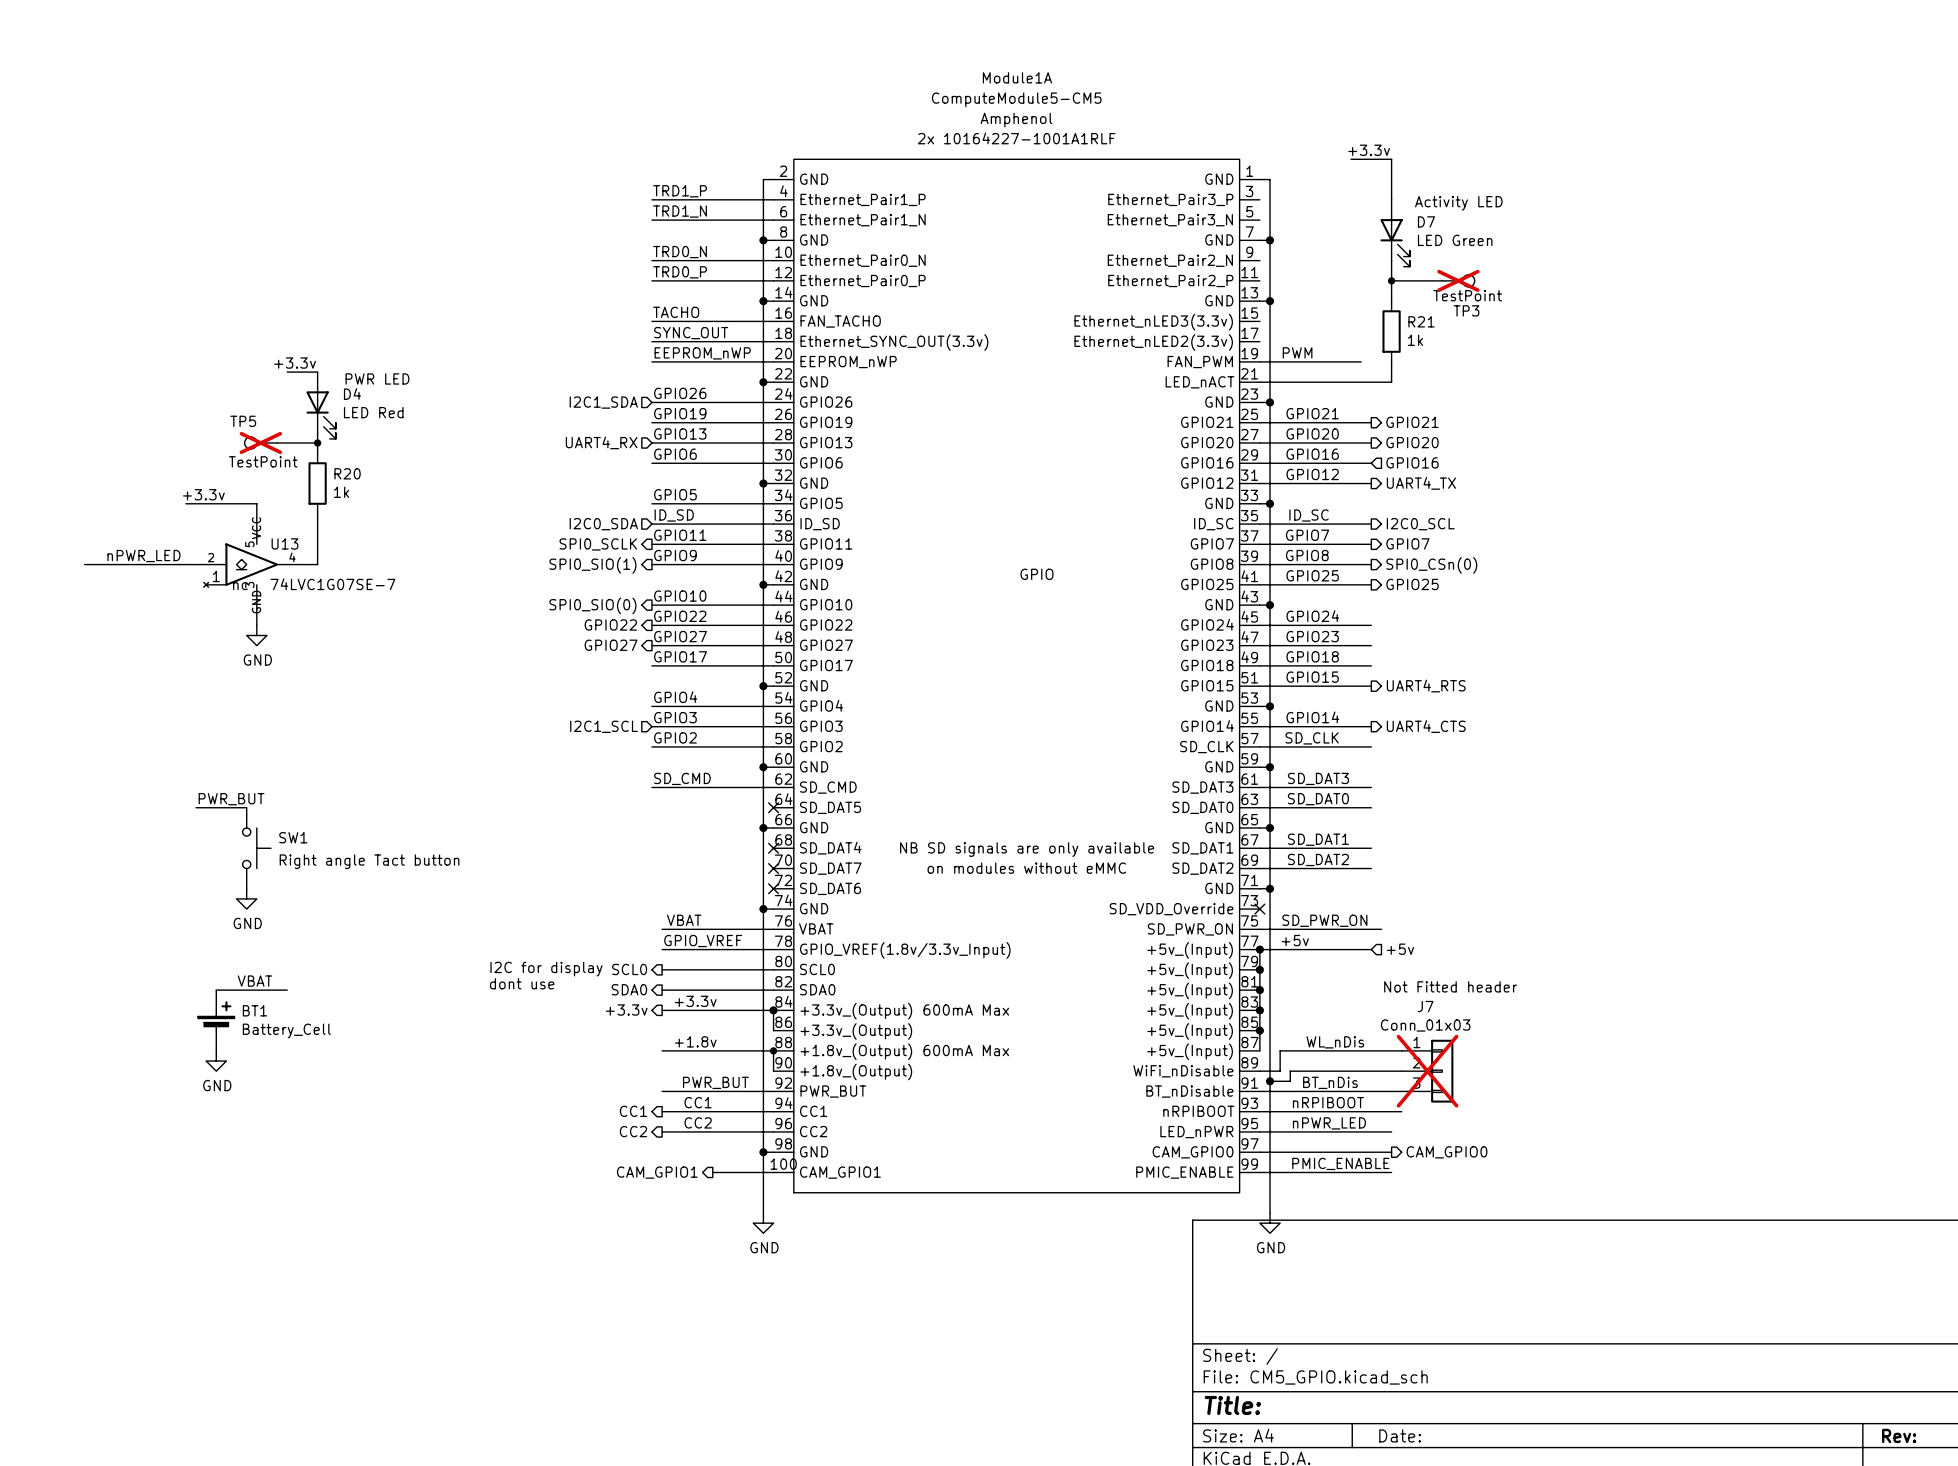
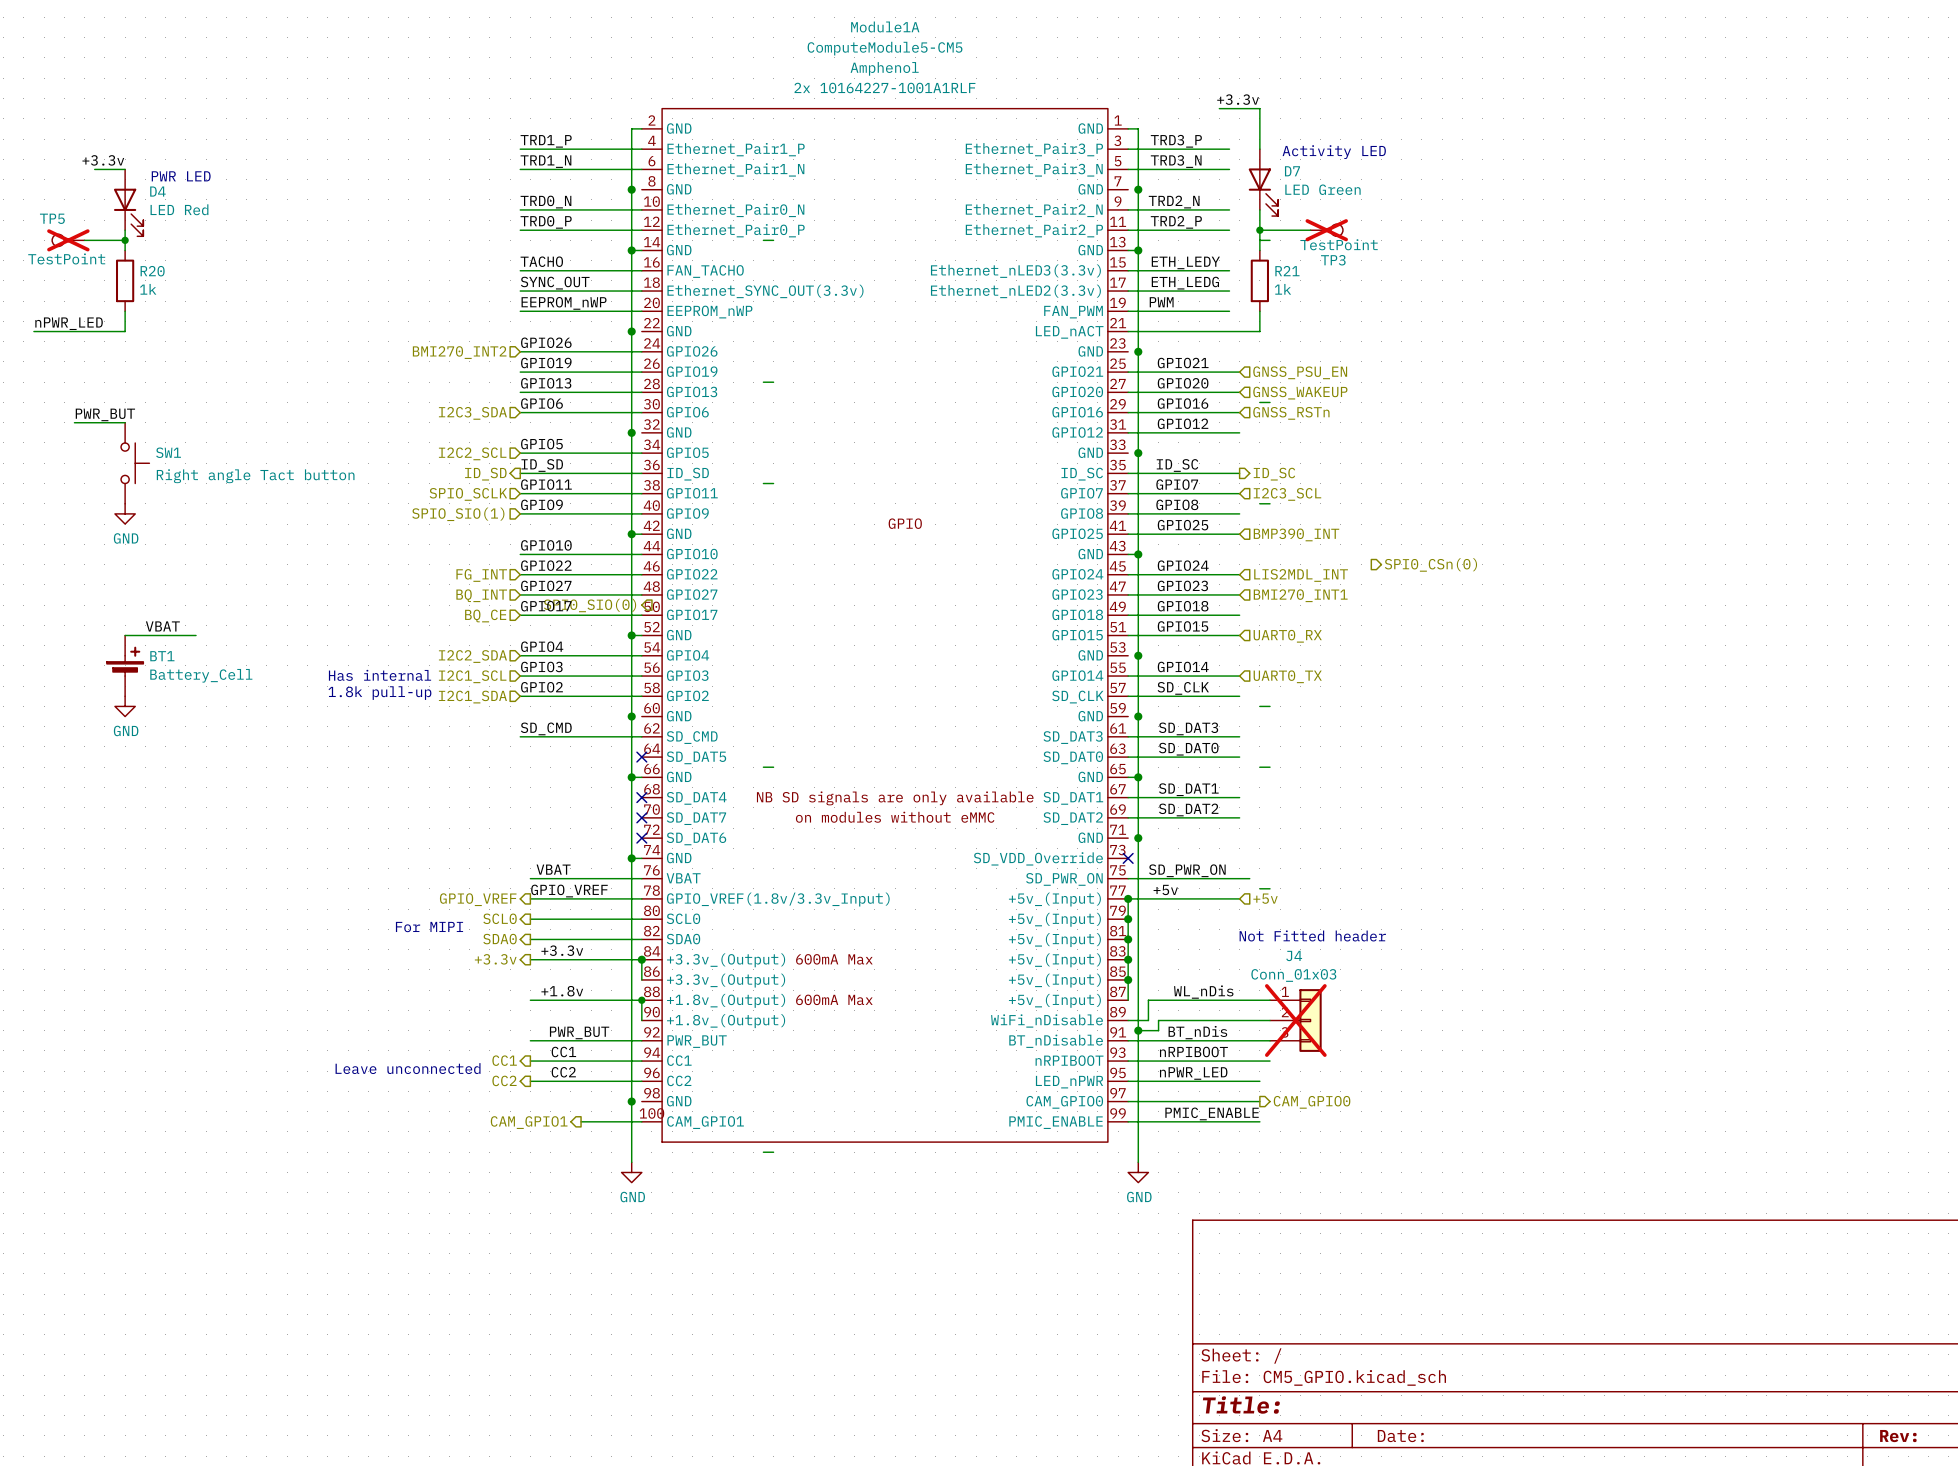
label: none -> TRD3_P (1176, 141)
wire: none -> (1128, 149) (1229, 149)
label position: +3.3v (1369, 150) -> +3.3v (1238, 99)
wire: (1351, 159) (1391, 159) (1391, 199) -> (1219, 108) (1259, 108) (1259, 149)
label: none -> +3.3v (103, 160)
label: none -> TRD3_N (1176, 161)
wire: none -> (94, 169) (125, 169)
wire: none -> (1128, 169) (1229, 169)
text: none -> PWR LED (181, 176)
wire: (773, 179) (763, 179) (763, 1213) -> (641, 128) (631, 128) (631, 1162)
wire: (1259, 179) (1270, 179) (1270, 1213) -> (1128, 128) (1138, 128) (1138, 1162)
junction: none -> (631, 189)
junction: none -> (1138, 189)
label position: TRD1_P (680, 191) -> TRD1_P (546, 141)
wire: (651, 199) (773, 199) -> (520, 149) (641, 149)
label: none -> TRD2_N (1174, 202)
text position: Activity LED (1458, 203) -> Activity LED (1334, 152)
wire: none -> (1128, 209) (1229, 209)
label position: TRD1_N (680, 211) -> TRD1_N (545, 161)
wire: (651, 220) (773, 220) -> (520, 169) (641, 169)
label: none -> TRD2_P (1176, 222)
wire: none -> (125, 230) (125, 250)
wire: none -> (1128, 230) (1229, 230)
junction: none -> (1259, 230)
D7 position: (1395, 233) -> (1263, 182)
wire: none -> (84, 240) (125, 240)
junction: none -> (125, 240)
junction: (763, 240) -> none
junction: (1270, 240) -> none
junction: none -> (631, 250)
junction: none -> (1138, 250)
label position: TRD0_N (680, 252) -> TRD0_N (545, 202)
wire: (651, 260) (773, 260) -> (520, 209) (641, 209)
wire: (1391, 260) (1391, 301) -> (1259, 209) (1259, 250)
label: none -> ETH_LEDY (1185, 262)
wire: none -> (1128, 270) (1229, 270)
label position: TRD0_P (680, 272) -> TRD0_P (546, 222)
wire: (651, 280) (773, 280) -> (520, 230) (641, 230)
wire: (1391, 280) (1442, 280) -> (1259, 230) (1310, 230)
junction: (1391, 280) -> none
TP3 position: (1458, 280) -> (1326, 230)
label: none -> ETH_LEDG (1185, 283)
wire: none -> (1128, 291) (1229, 291)
wire: (763, 301) (773, 301) -> (631, 250) (641, 250)
junction: (763, 301) -> none
junction: (1270, 301) -> none
wire: none -> (125, 311) (125, 331) (33, 331)
label position: TACHO (676, 312) -> TACHO (541, 261)
wire: (651, 321) (773, 321) -> (520, 270) (641, 270)
label: none -> nPWR_LED (69, 323)
junction: none -> (631, 331)
R21 position: (1391, 331) -> (1259, 280)
label position: SYNC_OUT (691, 333) -> SYNC_OUT (555, 283)
wire: (651, 341) (773, 341) -> (520, 291) (641, 291)
hierarchical label: none -> BMI270_INT2 (459, 352)
junction: none -> (1138, 351)
label position: PWM (1297, 352) -> PWM (1161, 302)
label position: EEPROM_nWP (702, 353) -> EEPROM_nWP (564, 303)
wire: (651, 361) (773, 361) -> (520, 311) (641, 311)
wire: (1259, 361) (1361, 361) -> (1128, 311) (1229, 311)
wire: (1391, 361) (1391, 382) (1259, 382) -> (1259, 311) (1259, 331) (1128, 331)
label: +3.3v (295, 363) -> none
wire: (287, 372) (317, 372) -> none
hierarchical label: none -> GNSS_PSU_EN (1300, 372)
text: PWR LED (377, 378) -> none
junction: (763, 382) -> none
hierarchical label: none -> GNSS_WAKEUP (1300, 393)
label position: GPIO26 (680, 393) -> GPIO26 (546, 342)
hierarchical label: I2C1_SDA (603, 402) -> none
wire: (651, 402) (773, 402) -> (520, 351) (641, 351)
junction: (1270, 402) -> none
D4 position: (321, 405) -> (128, 202)
hierarchical label: none -> I2C3_SDA (472, 413)
hierarchical label: none -> GNSS_RSTn (1291, 413)
label position: GPIO19 (680, 413) -> GPIO19 (546, 363)
label position: GPIO21 (1312, 413) -> GPIO21 (1183, 363)
label: none -> PWR_BUT (105, 414)
wire: none -> (74, 422) (125, 422)
wire: (651, 422) (773, 422) -> (520, 372) (641, 372)
wire: (1259, 422) (1371, 422) -> (1128, 372) (1239, 372)
hierarchical label: GPIO21 (1412, 422) -> none
wire: (317, 432) (317, 453) -> none
junction: none -> (631, 432)
label position: GPIO13 (680, 433) -> GPIO13 (546, 383)
label position: GPIO20 (1312, 433) -> GPIO20 (1183, 383)
TP5 position: (260, 442) -> (68, 240)
wire: (277, 442) (317, 442) -> none
junction: (317, 442) -> none
hierarchical label: UART4_RX (601, 442) -> none
wire: (651, 442) (773, 442) -> (520, 392) (641, 392)
wire: (1259, 442) (1371, 442) -> (1128, 392) (1239, 392)
hierarchical label: GPIO20 (1412, 442) -> none
hierarchical label: none -> I2C2_SCL (472, 453)
junction: none -> (1138, 453)
label position: GPIO6 (675, 454) -> GPIO6 (541, 403)
label position: GPIO16 (1312, 454) -> GPIO16 (1183, 403)
hierarchical label: GPIO16 (1412, 462) -> none
wire: (651, 463) (773, 463) -> (520, 412) (641, 412)
wire: (1259, 463) (1371, 463) -> (1128, 412) (1239, 412)
hierarchical label: none -> ID_SD (485, 474)
hierarchical label: none -> ID_SC (1274, 474)
label position: GPIO12 (1312, 474) -> GPIO12 (1183, 423)
R20 position: (317, 483) -> (125, 280)
junction: (763, 483) -> none
wire: (1259, 483) (1371, 483) -> (1128, 432) (1239, 432)
hierarchical label: UART4_TX (1421, 483) -> none
hierarchical label: none -> SPIO_SCLK (468, 494)
hierarchical label: none -> I2C3_SCL (1287, 494)
label: +3.3v (203, 494) -> none
label position: GPIO5 (675, 494) -> GPIO5 (541, 444)
wire: (185, 503) (256, 503) (256, 544) -> none
wire: (651, 503) (773, 503) -> (520, 453) (641, 453)
junction: (1270, 503) -> none
power symbol: none -> GND (125, 513)
wire: (317, 513) (317, 564) (307, 564) -> none
hierarchical label: none -> SPIO_SIO(1) (458, 514)
label position: ID_SD (674, 515) -> ID_SD (542, 465)
label position: ID_SC (1309, 515) -> ID_SC (1177, 465)
hierarchical label: I2C0_SDA (603, 524) -> none
wire: (651, 524) (773, 524) -> (520, 473) (641, 473)
wire: (1259, 524) (1371, 524) -> (1128, 473) (1239, 473)
hierarchical label: I2C0_SCL (1420, 524) -> none
junction: none -> (631, 534)
hierarchical label: none -> BMP390_INT (1296, 534)
label position: GPIO11 (680, 535) -> GPIO11 (546, 484)
label position: GPIO7 (1307, 535) -> GPIO7 (1177, 484)
hierarchical label: GPIO7 (1407, 543) -> none
hierarchical label: SPI0_SCLK (598, 544) -> none
wire: (651, 544) (773, 544) -> (520, 493) (641, 493)
wire: (1259, 544) (1371, 544) -> (1128, 493) (1239, 493)
junction: none -> (1138, 554)
label position: GPIO9 (675, 555) -> GPIO9 (541, 504)
label position: GPIO8 (1307, 555) -> GPIO8 (1177, 504)
label: nPWR_LED (144, 556) -> none
wire: (84, 564) (196, 564) -> none
wire: (651, 564) (773, 564) -> (520, 513) (641, 513)
wire: (1259, 564) (1371, 564) -> (1128, 513) (1239, 513)
U13: 74LVC1G07SE-7 (251, 565) -> none
hierarchical label: SPI0_SIO(1) (592, 565) -> none
hierarchical label: none -> FG_INT (481, 575)
hierarchical label: none -> LIS2MDL_INT (1301, 575)
label position: GPIO25 (1312, 575) -> GPIO25 (1183, 525)
wire: (256, 584) (256, 625) -> none
wire: (763, 584) (773, 584) -> (631, 534) (641, 534)
junction: (763, 584) -> none
wire: (1259, 584) (1371, 584) -> (1128, 534) (1239, 534)
hierarchical label: GPIO25 (1412, 584) -> none
hierarchical label: none -> BQ_INT (481, 595)
hierarchical label: none -> BMI270_INT1 (1300, 595)
label position: GPIO10 (680, 596) -> GPIO10 (546, 545)
wire: (651, 605) (773, 605) -> (520, 554) (641, 554)
wire: (1259, 605) (1270, 605) -> (1128, 554) (1138, 554)
junction: (1270, 605) -> none
hierarchical label: none -> BQ_CE (485, 615)
label position: GPIO22 (680, 616) -> GPIO22 (546, 565)
label position: GPIO24 (1312, 616) -> GPIO24 (1183, 565)
hierarchical label: GPIO22 (610, 624) -> none
wire: (651, 625) (773, 625) -> (520, 574) (641, 574)
wire: (1259, 625) (1371, 625) -> (1128, 574) (1239, 574)
label: none -> VBAT (162, 626)
wire: none -> (125, 635) (196, 635)
power symbol: GND (256, 635) -> none
junction: none -> (631, 635)
hierarchical label: none -> UART0_RX (1287, 636)
label position: GPIO27 (680, 636) -> GPIO27 (546, 585)
label position: GPIO23 (1312, 636) -> GPIO23 (1182, 585)
hierarchical label: GPIO27 (611, 645) -> none
wire: (651, 645) (773, 645) -> (520, 594) (641, 594)
wire: (1259, 645) (1371, 645) -> (1128, 594) (1239, 594)
hierarchical label: none -> I2C2_SDA (472, 656)
junction: none -> (1138, 655)
label position: GPIO17 (680, 656) -> GPIO17 (546, 606)
label position: GPIO18 (1312, 656) -> GPIO18 (1183, 606)
wire: (651, 665) (773, 665) -> (520, 615) (641, 615)
wire: (1259, 665) (1371, 665) -> (1128, 615) (1239, 615)
text: none -> Has internal (380, 675)
Module1A position: (1016, 676) -> (884, 625)
hierarchical label: none -> UART0_TX (1287, 676)
label position: GPIO15 (1312, 677) -> GPIO15 (1183, 626)
wire: (763, 686) (773, 686) -> (631, 635) (641, 635)
junction: (763, 686) -> none
wire: (1259, 686) (1371, 686) -> (1128, 635) (1239, 635)
hierarchical label: UART4_RTS (1426, 686) -> none
text: none -> 1.8k pull-up (379, 693)
hierarchical label: none -> I2C1_SDA (472, 697)
label position: GPIO4 (675, 697) -> GPIO4 (542, 646)
power symbol: none -> GND (125, 706)
wire: (651, 706) (773, 706) -> (520, 655) (641, 655)
junction: (1270, 706) -> none
junction: none -> (631, 716)
junction: none -> (1138, 716)
label position: GPIO3 (675, 717) -> GPIO3 (541, 666)
label position: GPIO14 (1312, 717) -> GPIO14 (1183, 666)
hierarchical label position: I2C1_SCL (604, 726) -> I2C1_SCL (472, 676)
wire: (651, 726) (773, 726) -> (520, 676) (641, 676)
wire: (1259, 726) (1371, 726) -> (1128, 676) (1239, 676)
hierarchical label: UART4_CTS (1426, 726) -> none
label position: GPIO2 (675, 737) -> GPIO2 (541, 687)
label position: SD_CLK (1312, 738) -> SD_CLK (1183, 688)
wire: (651, 746) (773, 746) -> (520, 696) (641, 696)
wire: (1259, 746) (1371, 746) -> (1128, 696) (1239, 696)
no-connect mark: none -> (641, 757)
junction: (763, 767) -> none
junction: (1270, 767) -> none
junction: none -> (631, 777)
junction: none -> (1138, 777)
label position: SD_CMD (682, 778) -> SD_CMD (546, 728)
label position: SD_DAT3 (1318, 778) -> SD_DAT3 (1188, 728)
wire: (651, 787) (773, 787) -> (520, 736) (641, 736)
wire: (1259, 787) (1371, 787) -> (1128, 736) (1239, 736)
no-connect mark: none -> (641, 797)
label: PWR_BUT (231, 799) -> none
label position: SD_DAT0 (1318, 799) -> SD_DAT0 (1188, 749)
wire: (196, 807) (246, 807) -> none
no-connect mark: (773, 807) -> none
wire: (1259, 807) (1371, 807) -> (1128, 757) (1239, 757)
no-connect mark: none -> (641, 817)
wire: (763, 828) (773, 828) -> (631, 777) (641, 777)
junction: (763, 828) -> none
wire: (1259, 828) (1270, 828) -> (1128, 777) (1138, 777)
junction: (1270, 828) -> none
no-connect mark: none -> (641, 838)
junction: none -> (1138, 838)
label position: SD_DAT1 (1318, 839) -> SD_DAT1 (1188, 789)
SW1 position: (256, 848) -> (135, 463)
no-connect mark: (773, 848) -> none
wire: (1259, 848) (1371, 848) -> (1128, 797) (1239, 797)
junction: none -> (631, 858)
no-connect mark: none -> (1128, 858)
label position: SD_DAT2 (1318, 859) -> SD_DAT2 (1188, 809)
no-connect mark: (773, 868) -> none
wire: (1259, 868) (1371, 868) -> (1128, 817) (1239, 817)
no-connect mark: (773, 888) -> none
junction: (1270, 888) -> none
power symbol: GND (246, 898) -> none
junction: none -> (1128, 898)
hierarchical label: none -> GPIO_VREF (478, 899)
wire: (763, 909) (773, 909) -> (631, 858) (641, 858)
junction: (763, 909) -> none
no-connect mark: (1259, 909) -> none
junction: none -> (1128, 919)
label position: VBAT (684, 920) -> VBAT (553, 869)
label position: SD_PWR_ON (1324, 920) -> SD_PWR_ON (1187, 870)
text: none -> For MIPI (429, 927)
wire: (662, 929) (773, 929) -> (530, 878) (641, 878)
wire: (1259, 929) (1381, 929) -> (1128, 878) (1249, 878)
junction: none -> (1128, 939)
label position: +5v (1295, 940) -> +5v (1165, 889)
label position: GPIO_VREF (703, 941) -> GPIO_VREF (569, 891)
wire: (662, 949) (773, 949) -> (530, 898) (641, 898)
junction: (1259, 949) -> none
wire: (1371, 949) (1259, 949) (1259, 1050) -> (1239, 898) (1128, 898) (1128, 1000)
hierarchical label position: +5v (1400, 949) -> +5v (1265, 898)
junction: none -> (641, 959)
junction: none -> (1128, 959)
text: I2C for display (546, 969) -> none
hierarchical label position: SCL0 (629, 969) -> SCL0 (500, 918)
wire: (662, 969) (773, 969) -> (530, 919) (641, 919)
junction: (1259, 969) -> none
junction: none -> (1128, 979)
label: VBAT (254, 981) -> none
text: dont use (522, 983) -> none
text position: Not Fitted header (1450, 986) -> Not Fitted header (1312, 935)
hierarchical label position: SDA0 (629, 989) -> SDA0 (500, 939)
wire: (216, 990) (287, 990) -> none
wire: (662, 990) (773, 990) -> (530, 939) (641, 939)
junction: (1259, 990) -> none
junction: none -> (641, 1000)
label position: +3.3v (695, 1001) -> +3.3v (562, 950)
hierarchical label position: +3.3v (626, 1010) -> +3.3v (495, 959)
wire: (662, 1010) (773, 1010) (773, 1030) -> (530, 959) (641, 959) (641, 979)
junction: (773, 1010) -> none
junction: (1259, 1010) -> none
BT1 position: (216, 1020) -> (125, 665)
J4: none -> Conn_01x03 (1295, 1020)
junction: none -> (1138, 1030)
junction: (1259, 1030) -> none
label position: +1.8v (695, 1041) -> +1.8v (562, 991)
label position: WL_nDis (1335, 1042) -> WL_nDis (1203, 992)
wire: (662, 1050) (773, 1050) (773, 1071) -> (530, 1000) (641, 1000) (641, 1020)
junction: (773, 1050) -> none
wire: (1401, 1050) (1280, 1050) (1280, 1071) (1259, 1071) -> (1270, 1000) (1148, 1000) (1148, 1020) (1128, 1020)
power symbol: GND (216, 1061) -> none
text: none -> Leave unconnected (408, 1068)
wire: (1401, 1071) (1290, 1071) (1290, 1081) (1270, 1081) -> (1270, 1020) (1158, 1020) (1158, 1030) (1138, 1030)
J7: Conn_01x03 (1427, 1071) -> none
junction: (1270, 1081) -> none
label position: PWR_BUT (715, 1082) -> PWR_BUT (579, 1032)
label position: BT_nDis (1330, 1082) -> BT_nDis (1197, 1032)
wire: (662, 1091) (773, 1091) -> (530, 1040) (641, 1040)
wire: (1259, 1091) (1401, 1091) -> (1128, 1040) (1270, 1040)
junction: none -> (631, 1101)
label position: CC1 (698, 1102) -> CC1 (563, 1051)
label position: nRPIBOOT (1328, 1102) -> nRPIBOOT (1193, 1051)
hierarchical label position: CC1 (633, 1111) -> CC1 (504, 1060)
wire: (662, 1111) (773, 1111) -> (530, 1061) (641, 1061)
wire: (1259, 1111) (1401, 1111) -> (1128, 1061) (1270, 1061)
label position: CC2 (698, 1122) -> CC2 (563, 1072)
label position: nPWR_LED (1329, 1123) -> nPWR_LED (1193, 1073)
hierarchical label position: CC2 (633, 1131) -> CC2 (504, 1080)
wire: (662, 1131) (773, 1131) -> (530, 1081) (641, 1081)
wire: (1259, 1131) (1391, 1131) -> (1128, 1081) (1259, 1081)
junction: (763, 1152) -> none
wire: (1259, 1152) (1391, 1152) -> (1128, 1101) (1259, 1101)
hierarchical label position: CAM_GPIO0 (1446, 1152) -> CAM_GPIO0 (1312, 1102)
label position: PMIC_ENABLE (1340, 1163) -> PMIC_ENABLE (1212, 1113)
hierarchical label position: CAM_GPIO1 (657, 1172) -> CAM_GPIO1 (529, 1122)
wire: (712, 1172) (773, 1172) -> (581, 1121) (641, 1121)
wire: (1259, 1172) (1391, 1172) -> (1128, 1121) (1259, 1121)
power symbol position: GND (763, 1223) -> GND (631, 1172)
power symbol position: GND (1270, 1223) -> GND (1138, 1172)

